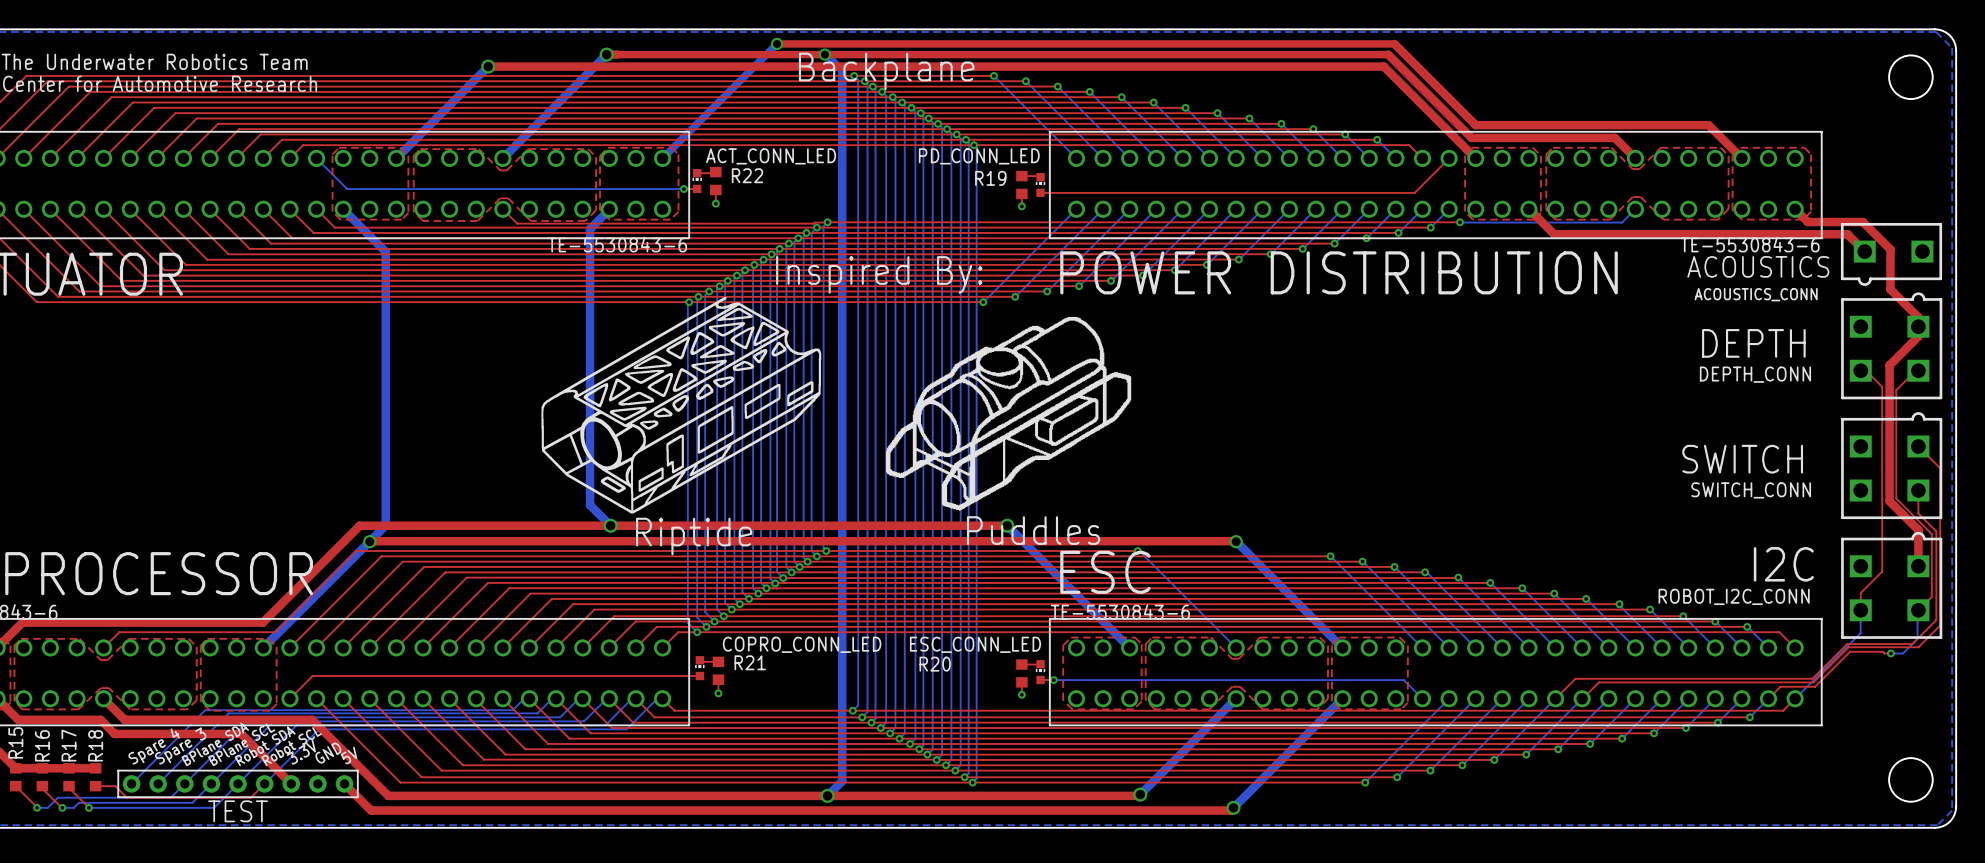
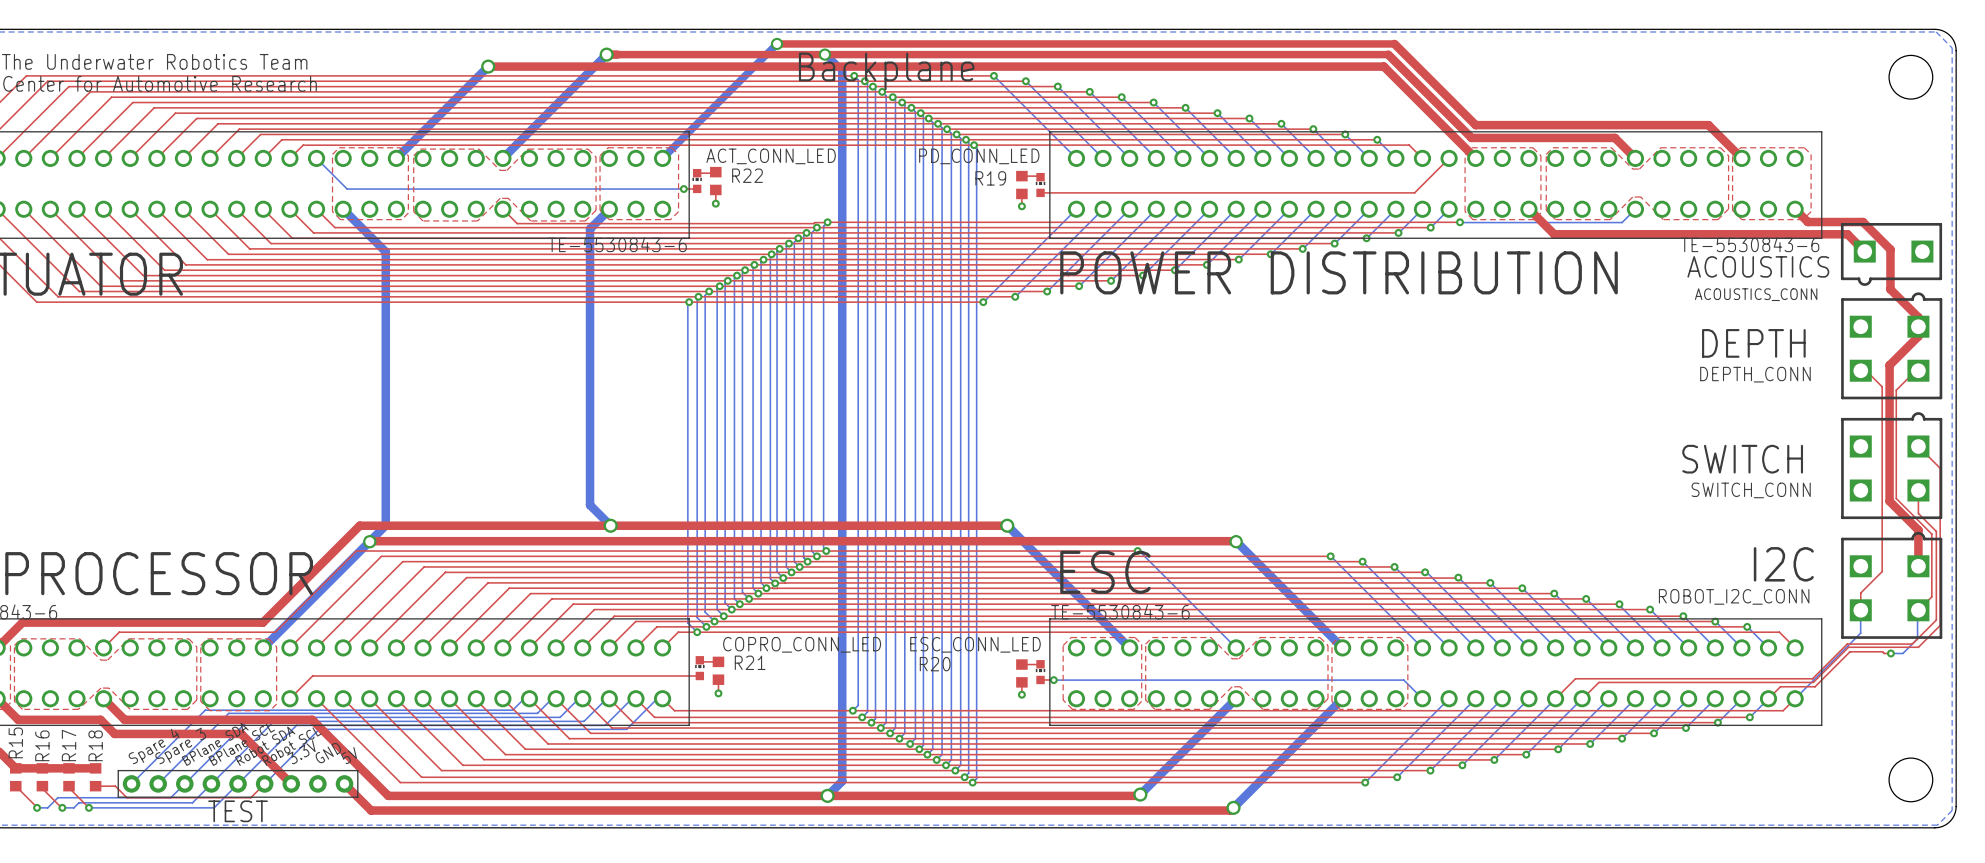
text: Inspired By: (879, 274) -> none
drawing: [541, 296, 822, 514] -> none
drawing: [885, 316, 1132, 511] -> none
text: Puddles (1033, 530) -> none
text: Riptide (694, 536) -> none

